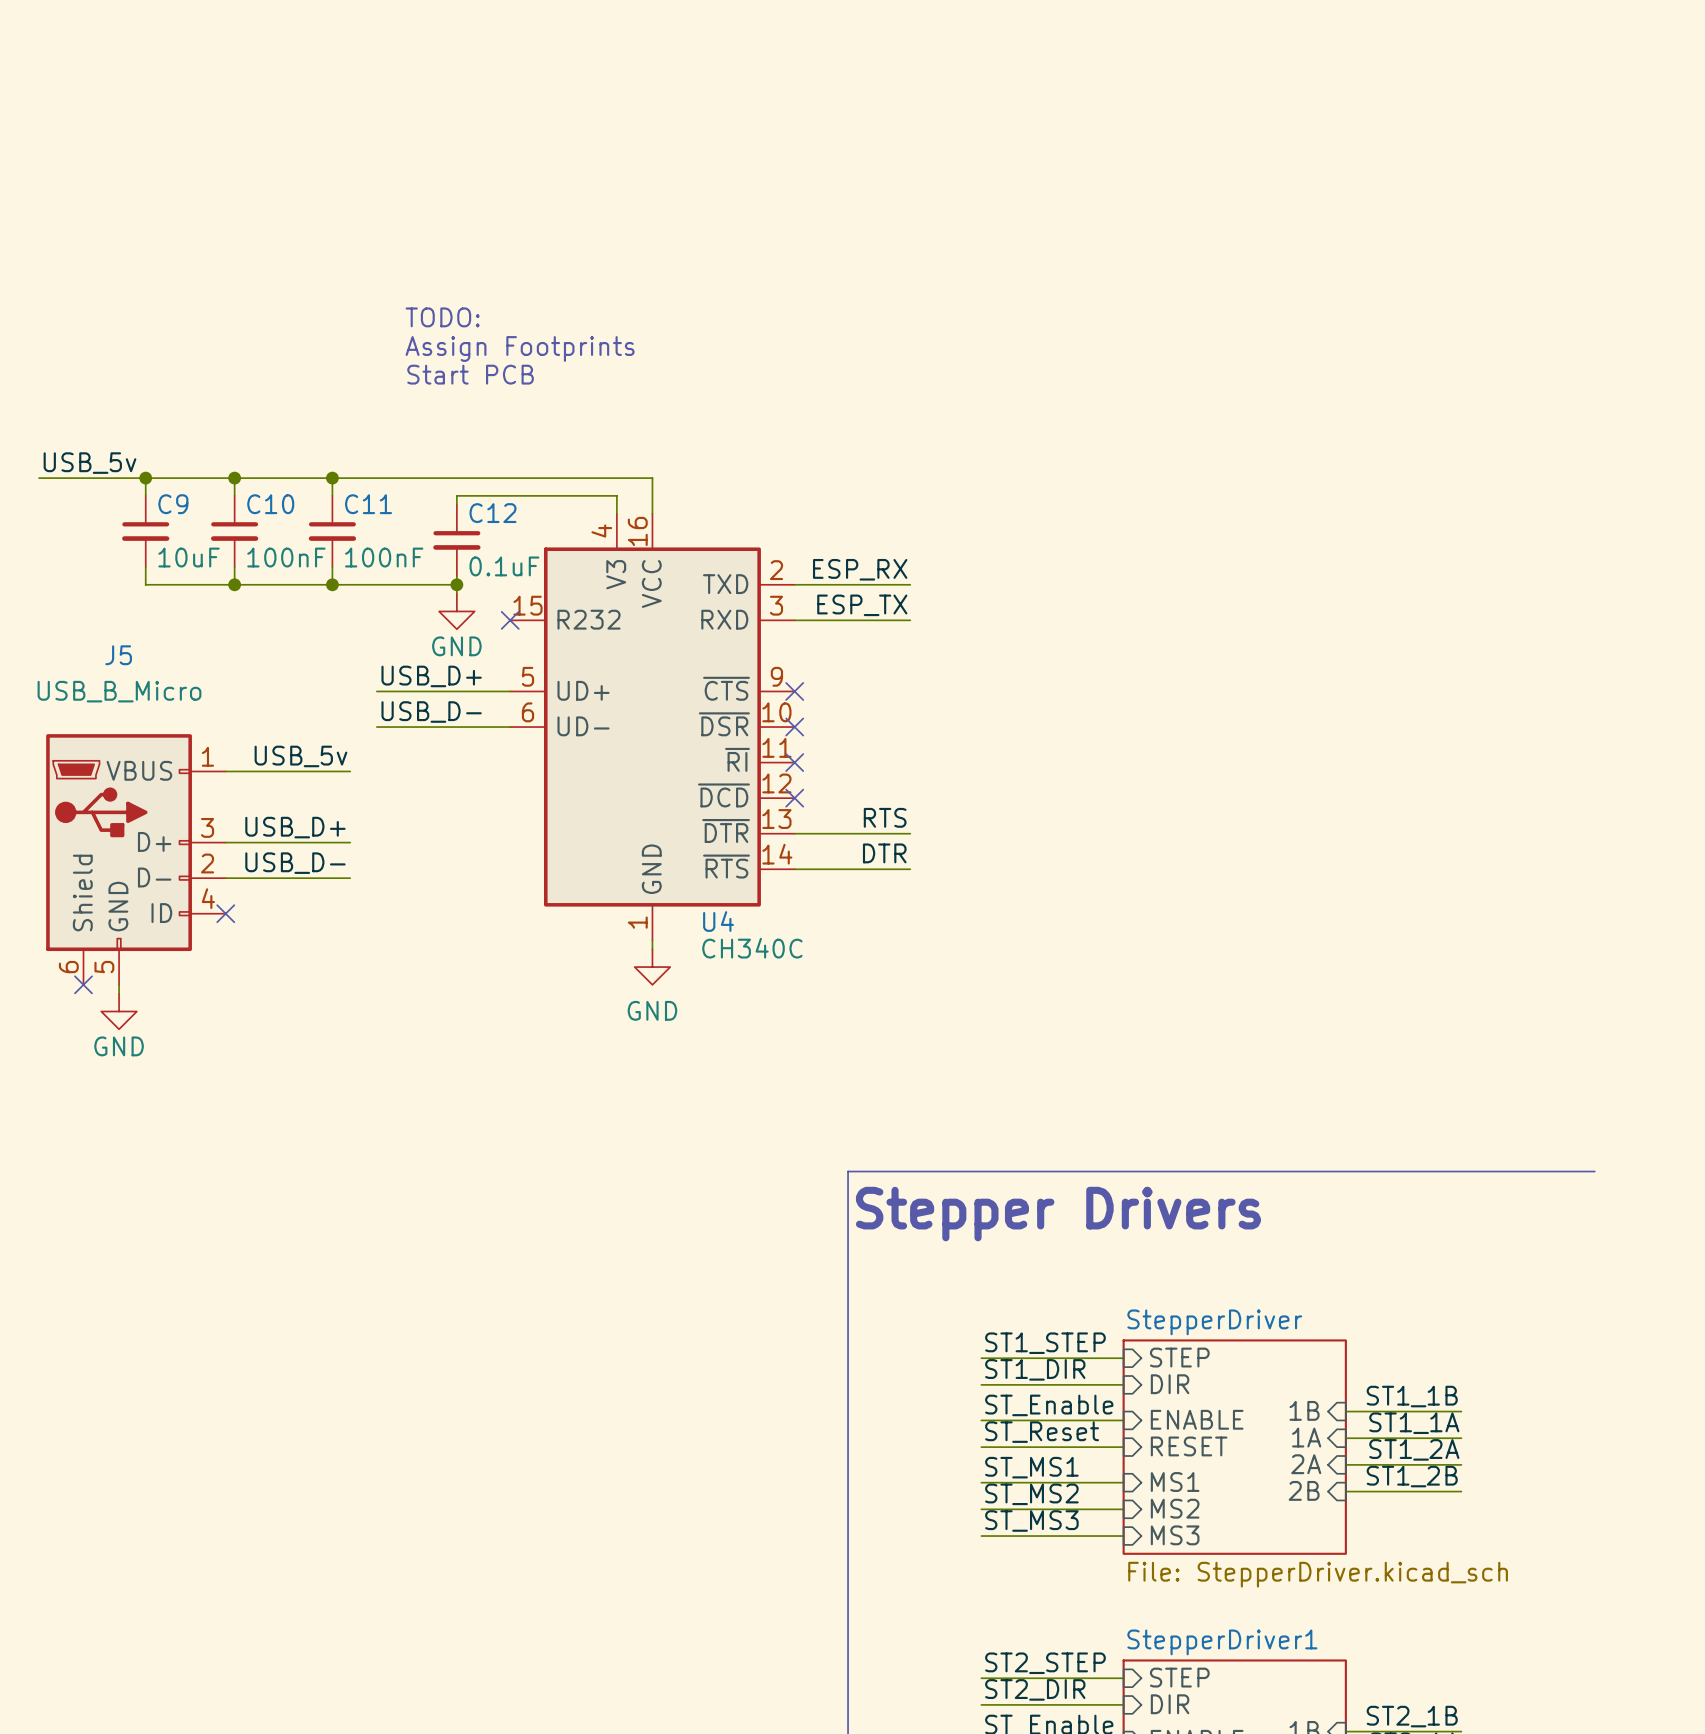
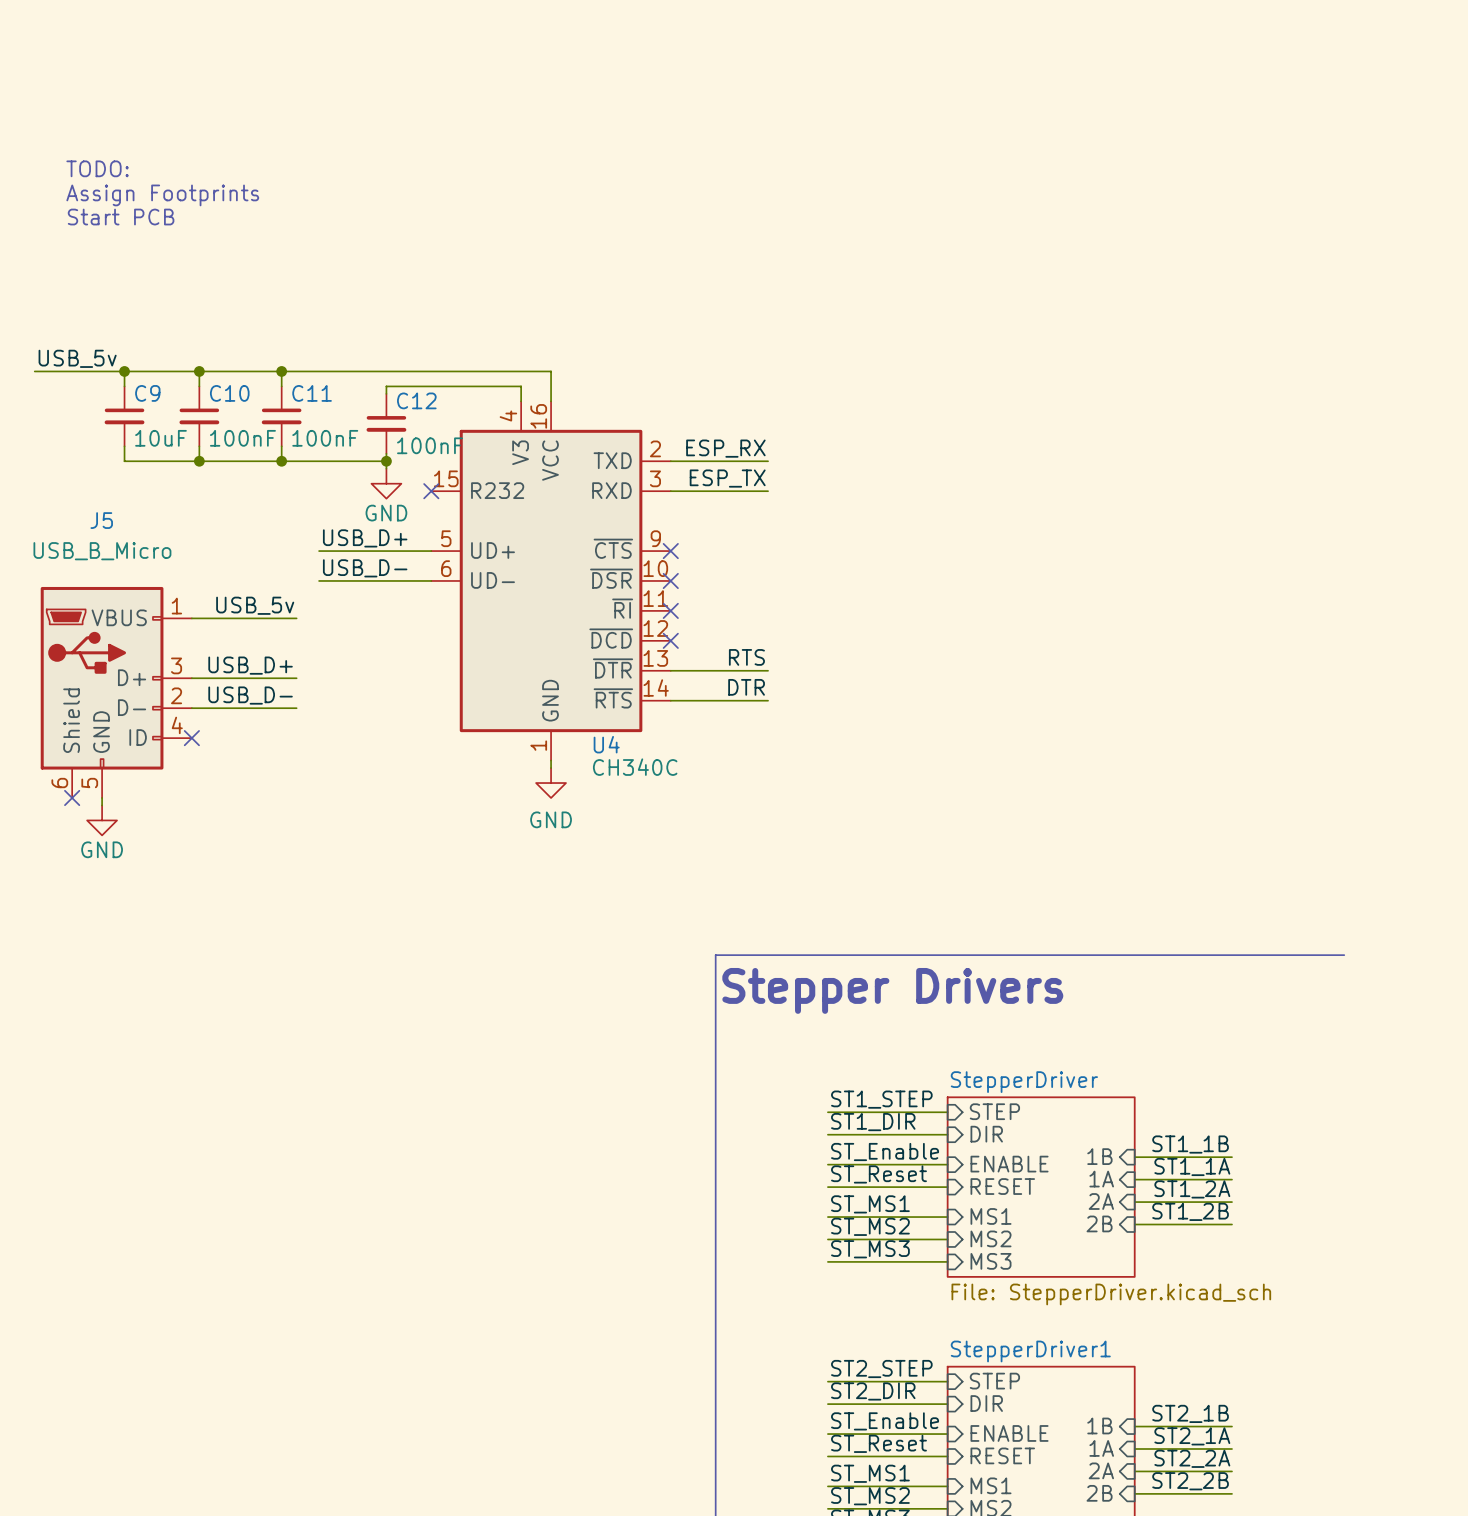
text position: TODO: (442, 317) -> TODO: (97, 168)
text position: Assign Footprints (520, 348) -> Assign Footprints (162, 195)
text position: Start PCB (470, 374) -> Start PCB (121, 217)
C12 value: 0.1uF (504, 566) -> 100nF (430, 445)

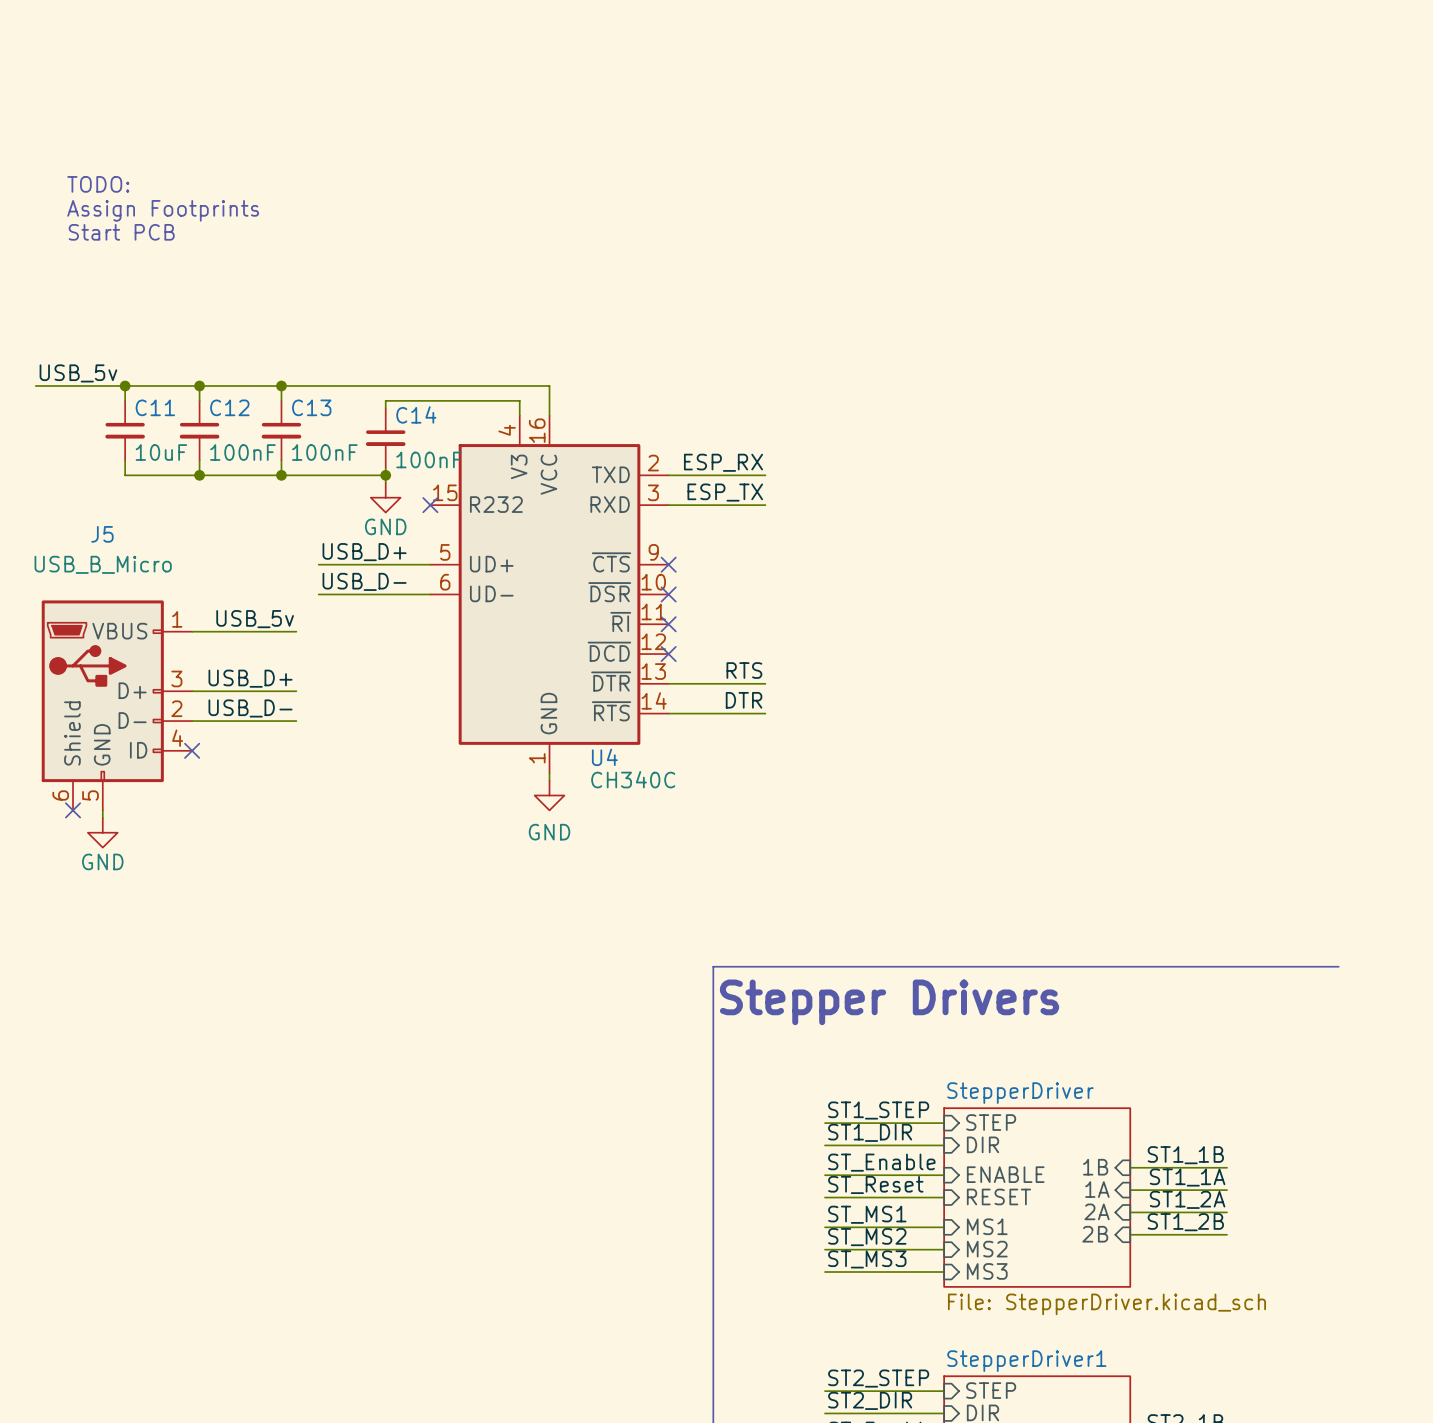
C9 name: C9 (147, 393) -> C11 (155, 407)
C10 name: C10 (229, 393) -> C12 (229, 407)
C11 name: C11 (312, 393) -> C13 (311, 407)
C12 name: C12 (416, 400) -> C14 (416, 414)

